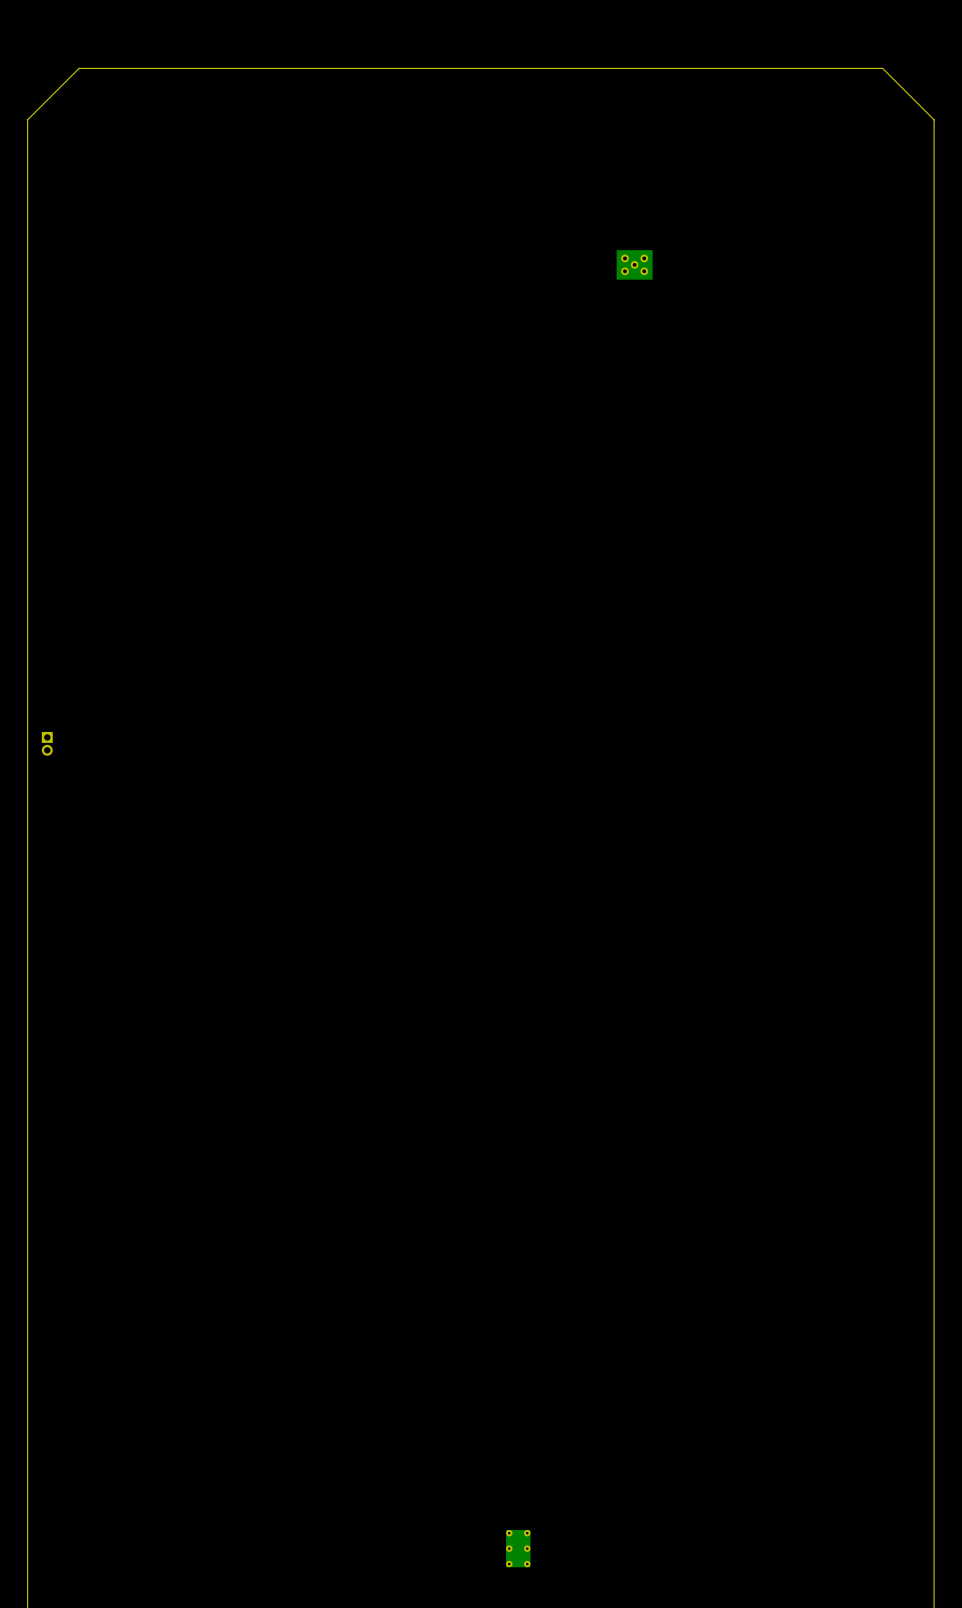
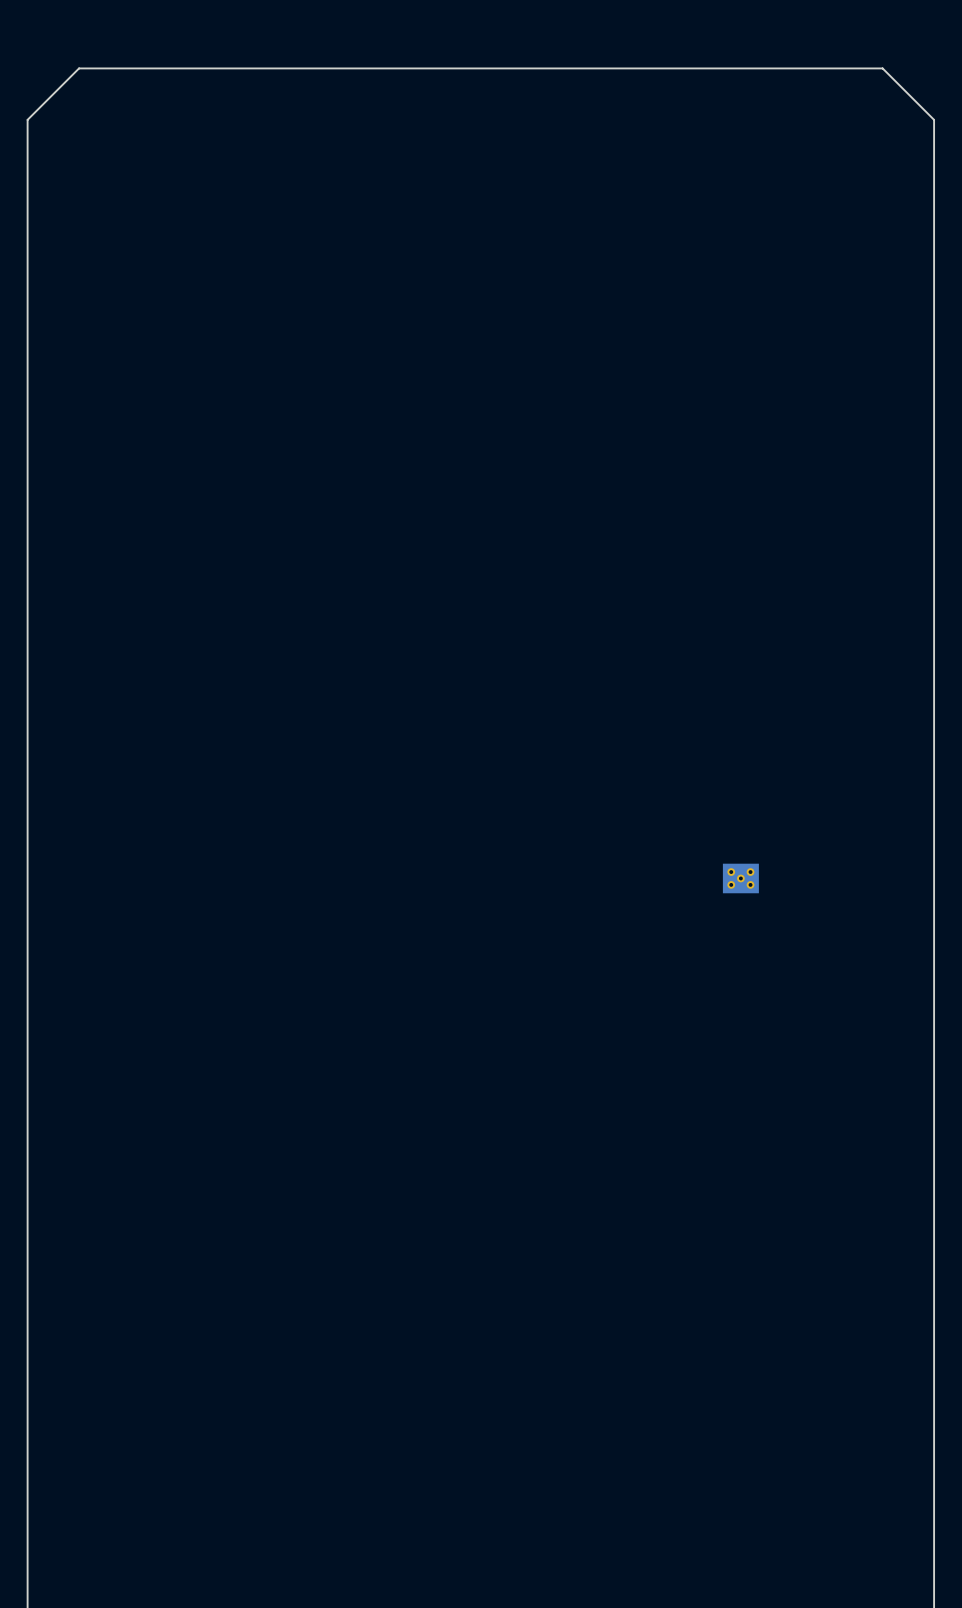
part: (634, 264) -> none
part: (47, 743) -> none
part: none -> (740, 878)
part: (518, 1548) -> none

